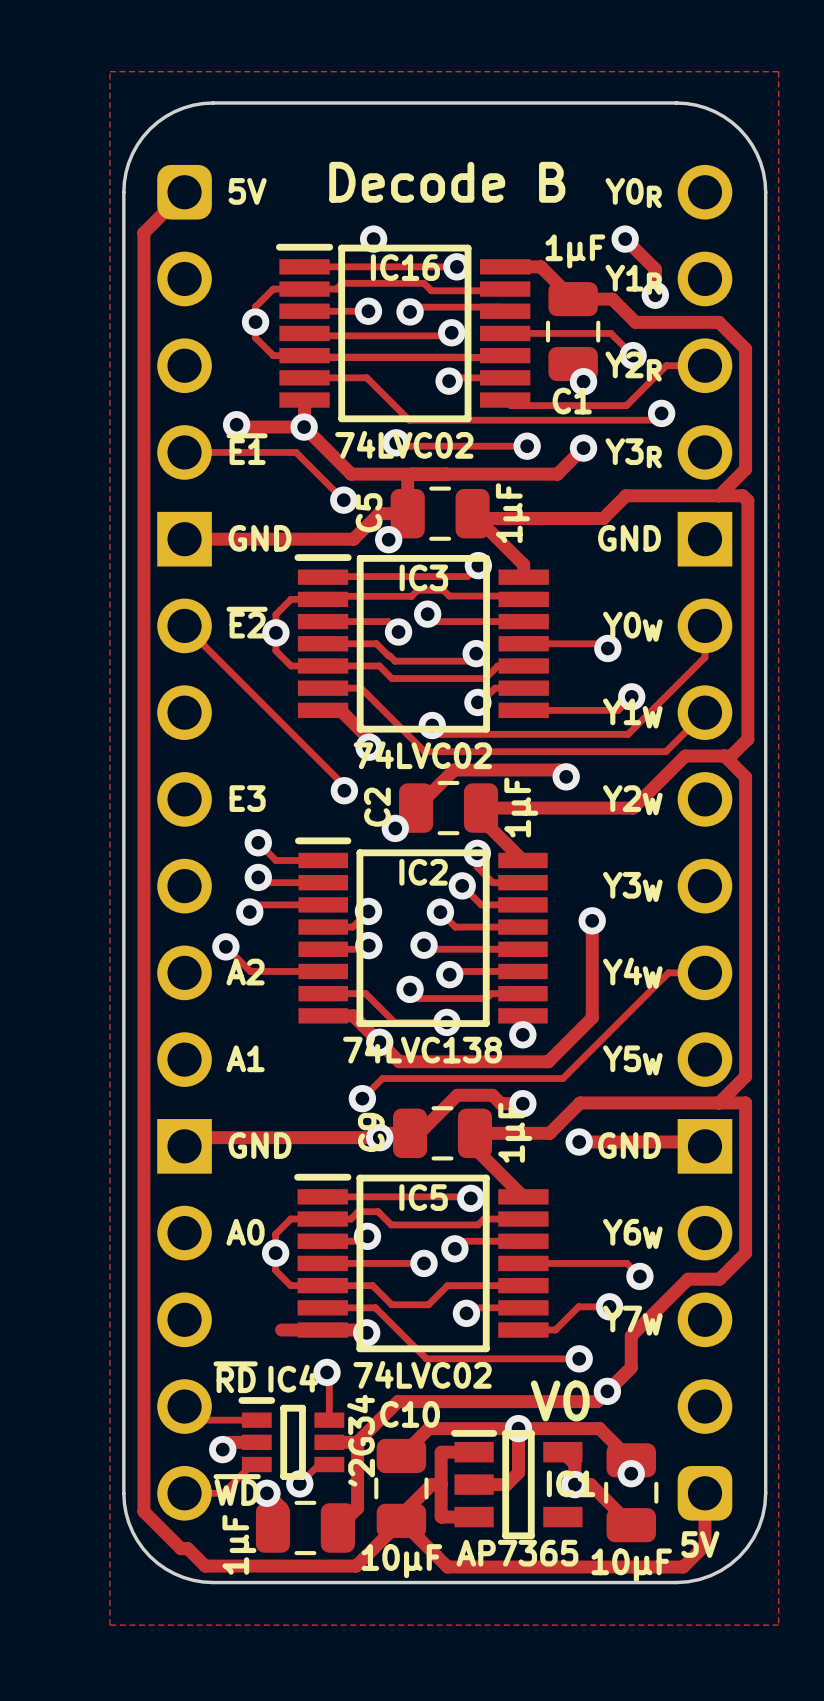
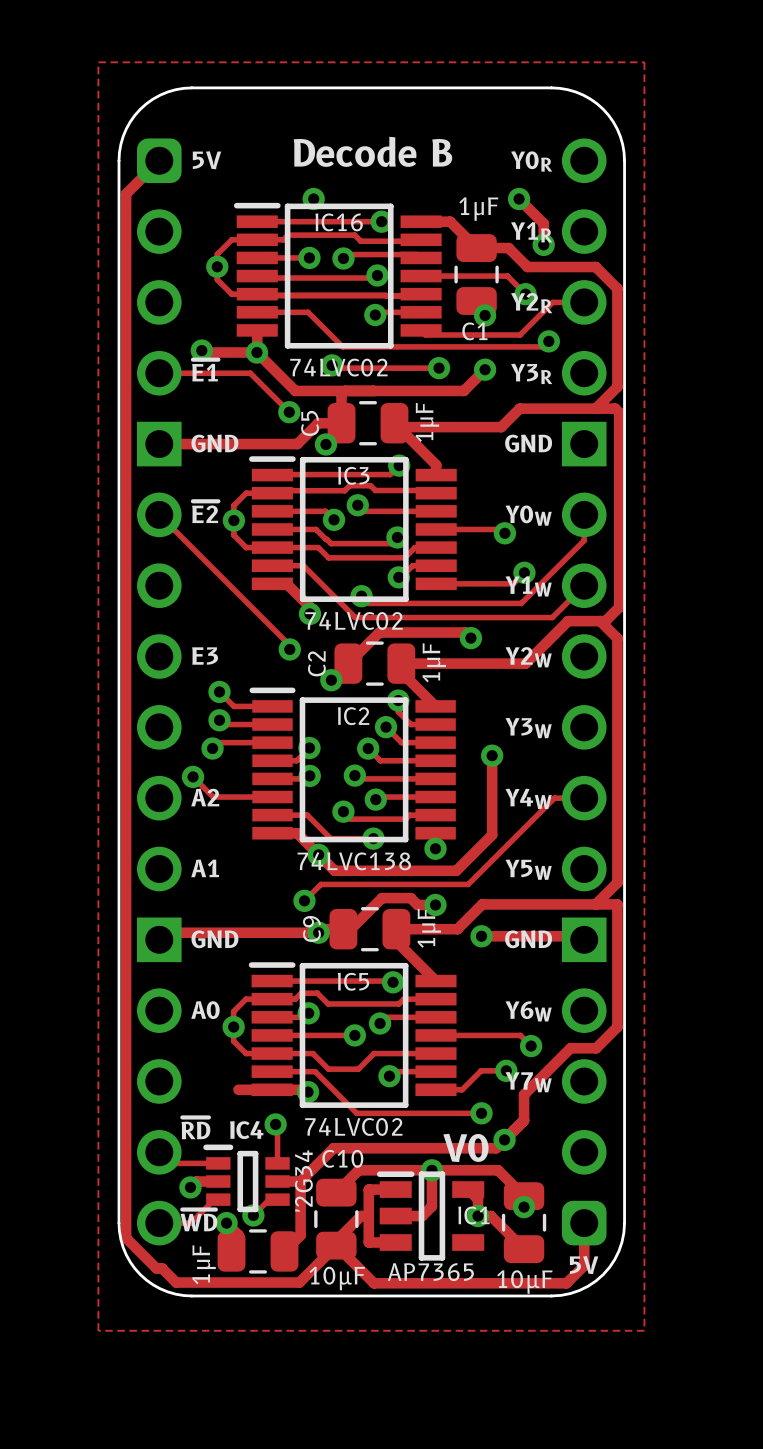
part footprint: [122, 101, 768, 1585] -> [117, 86, 626, 1298]

